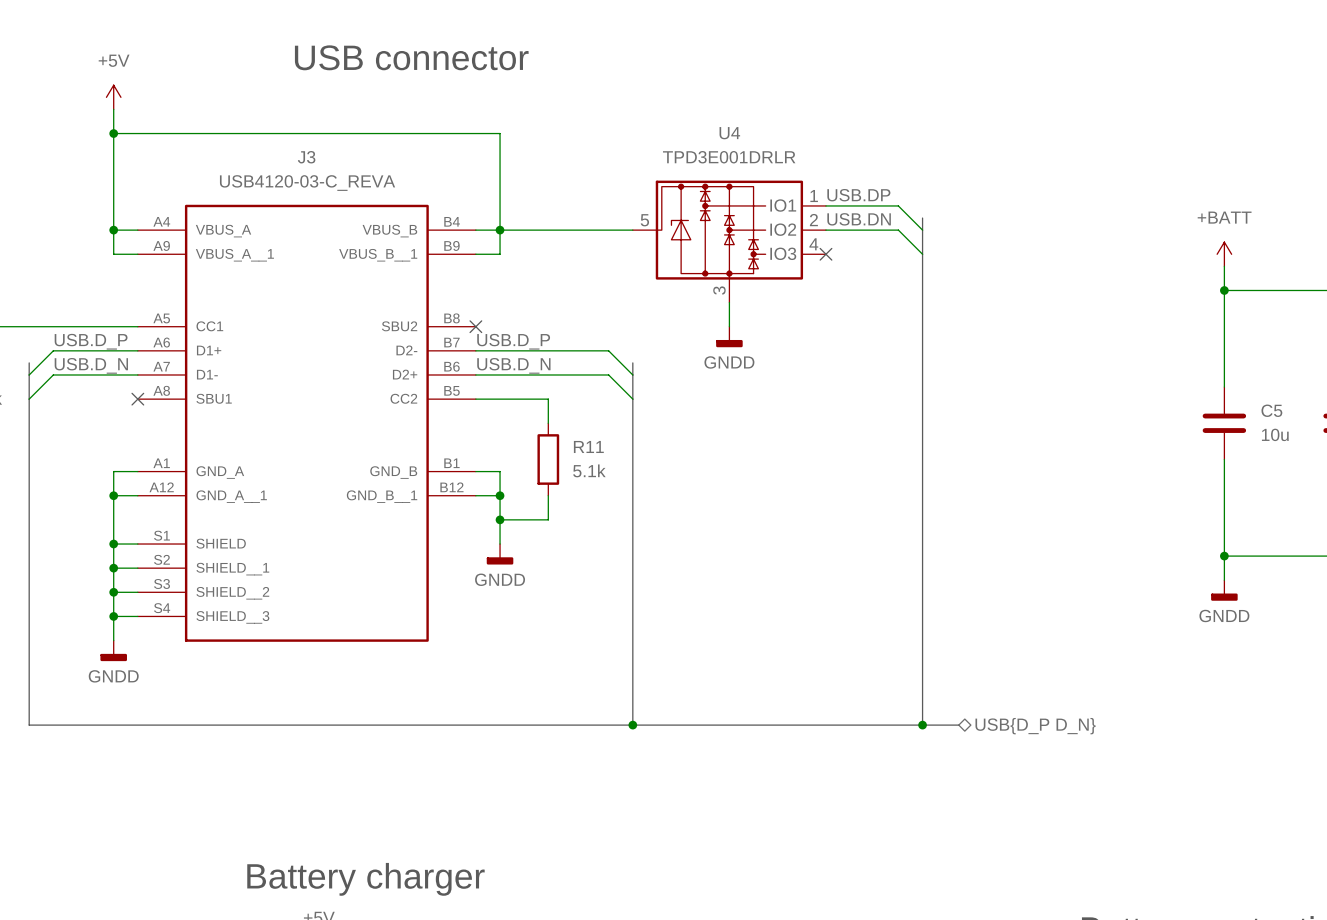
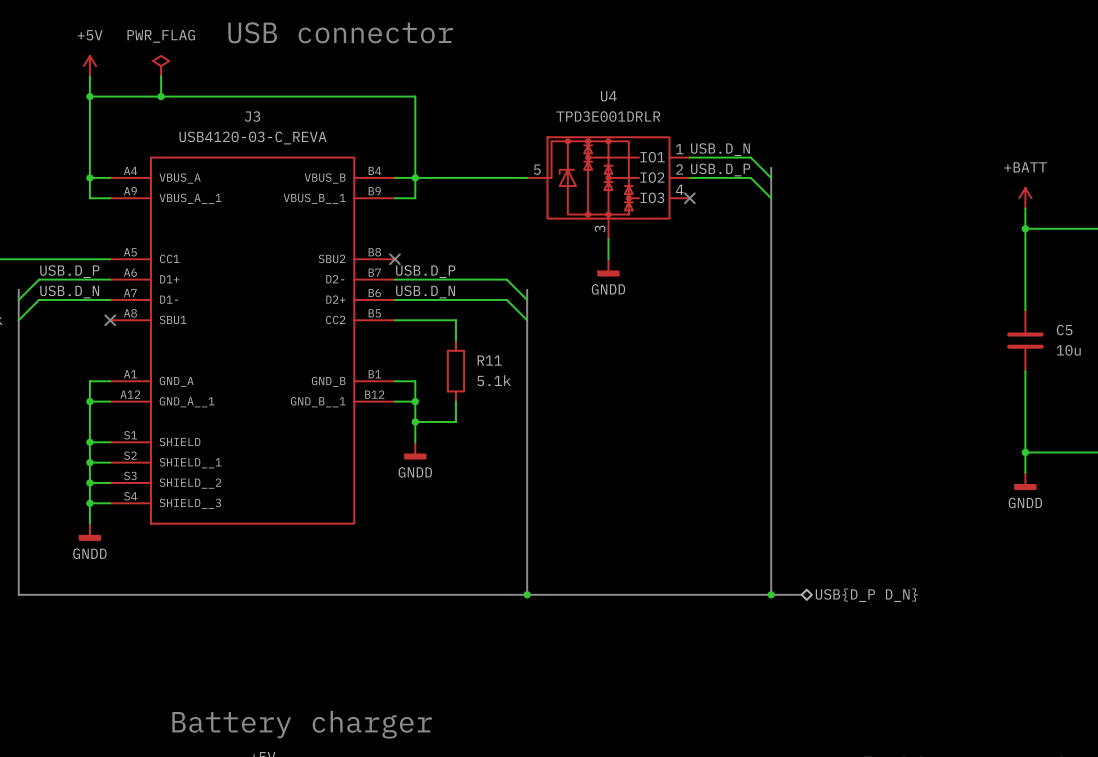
power symbol: none -> PWR_FLAG (161, 66)
wire: none -> (161, 76) (161, 96)
junction: none -> (161, 96)
label: USB.DP (858, 195) -> USB.D_N (720, 149)
label: USB.DN (859, 219) -> USB.D_P (720, 169)

